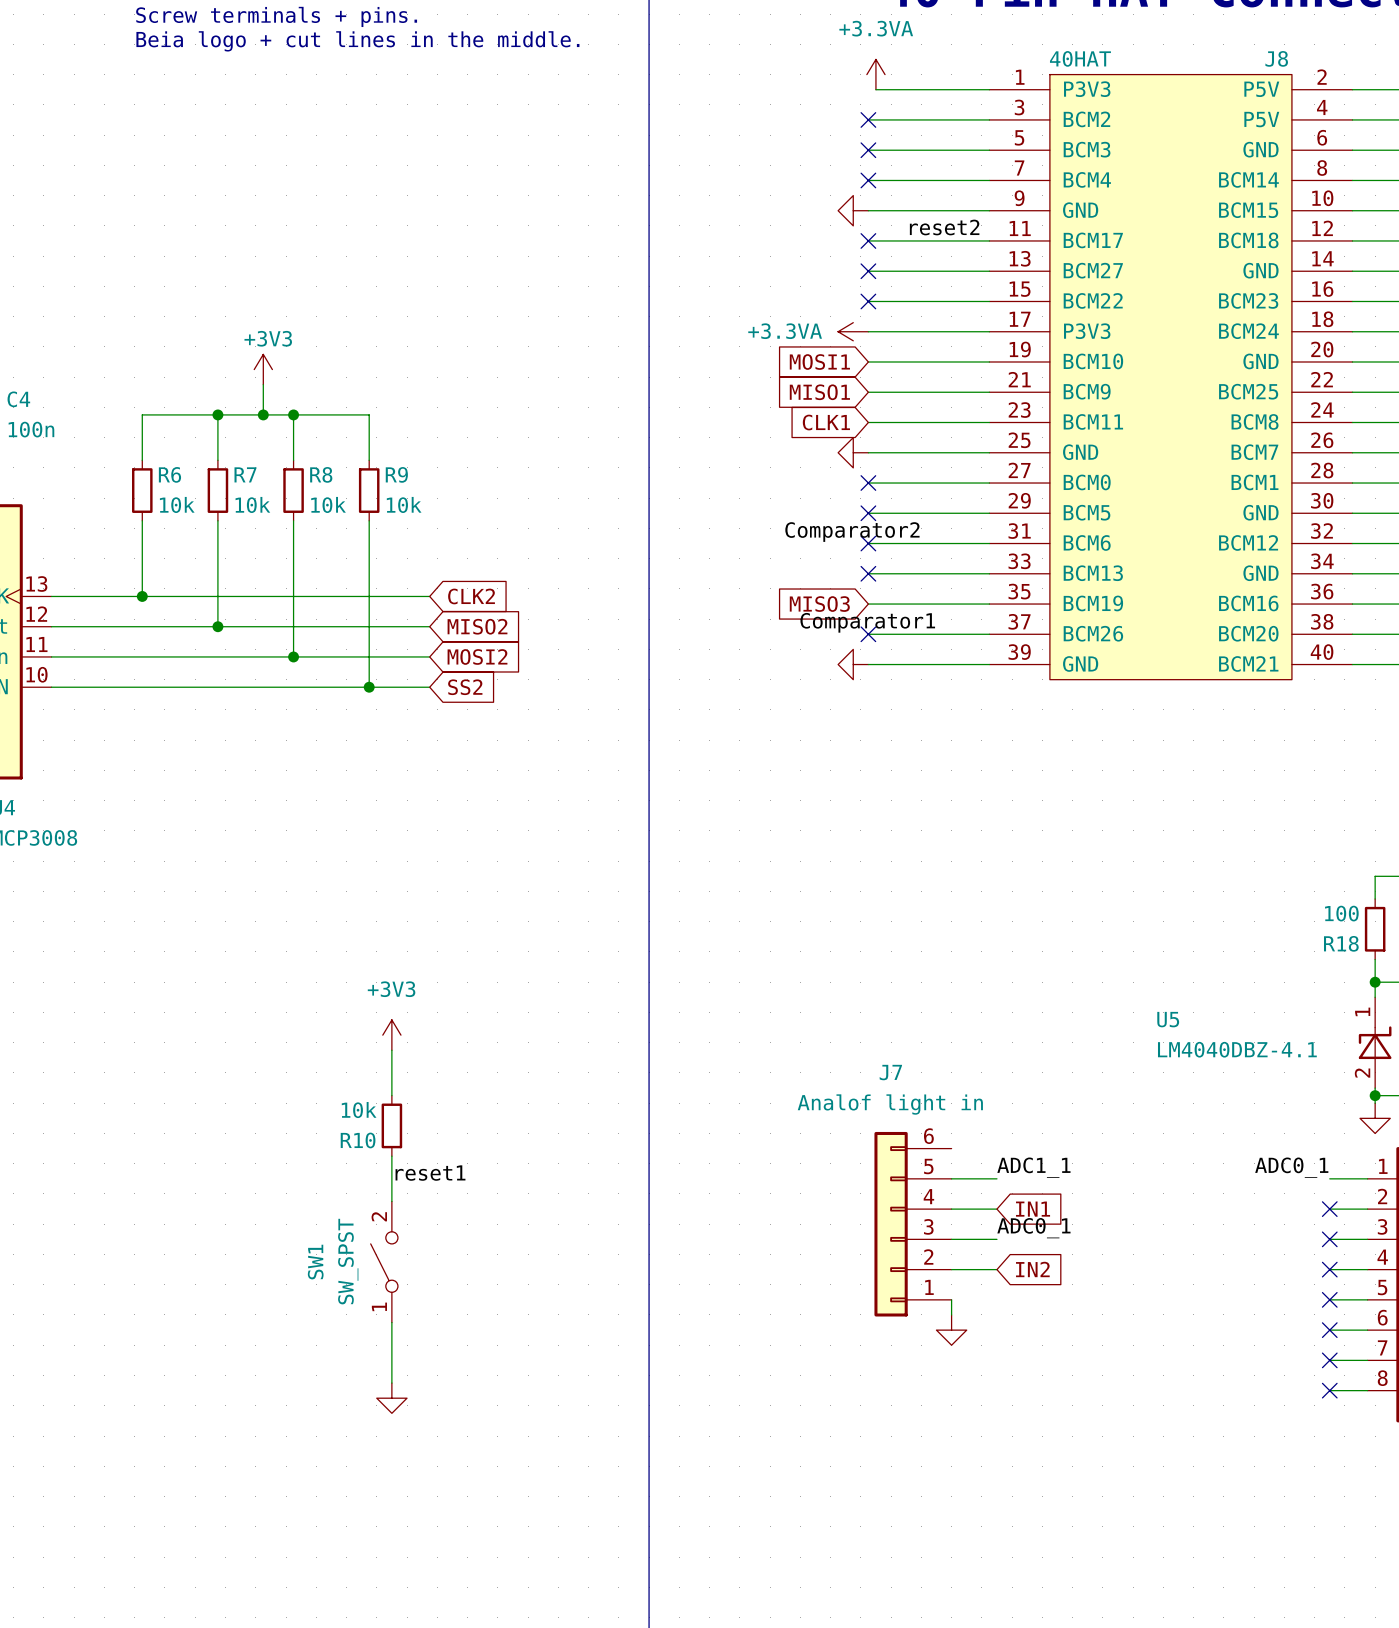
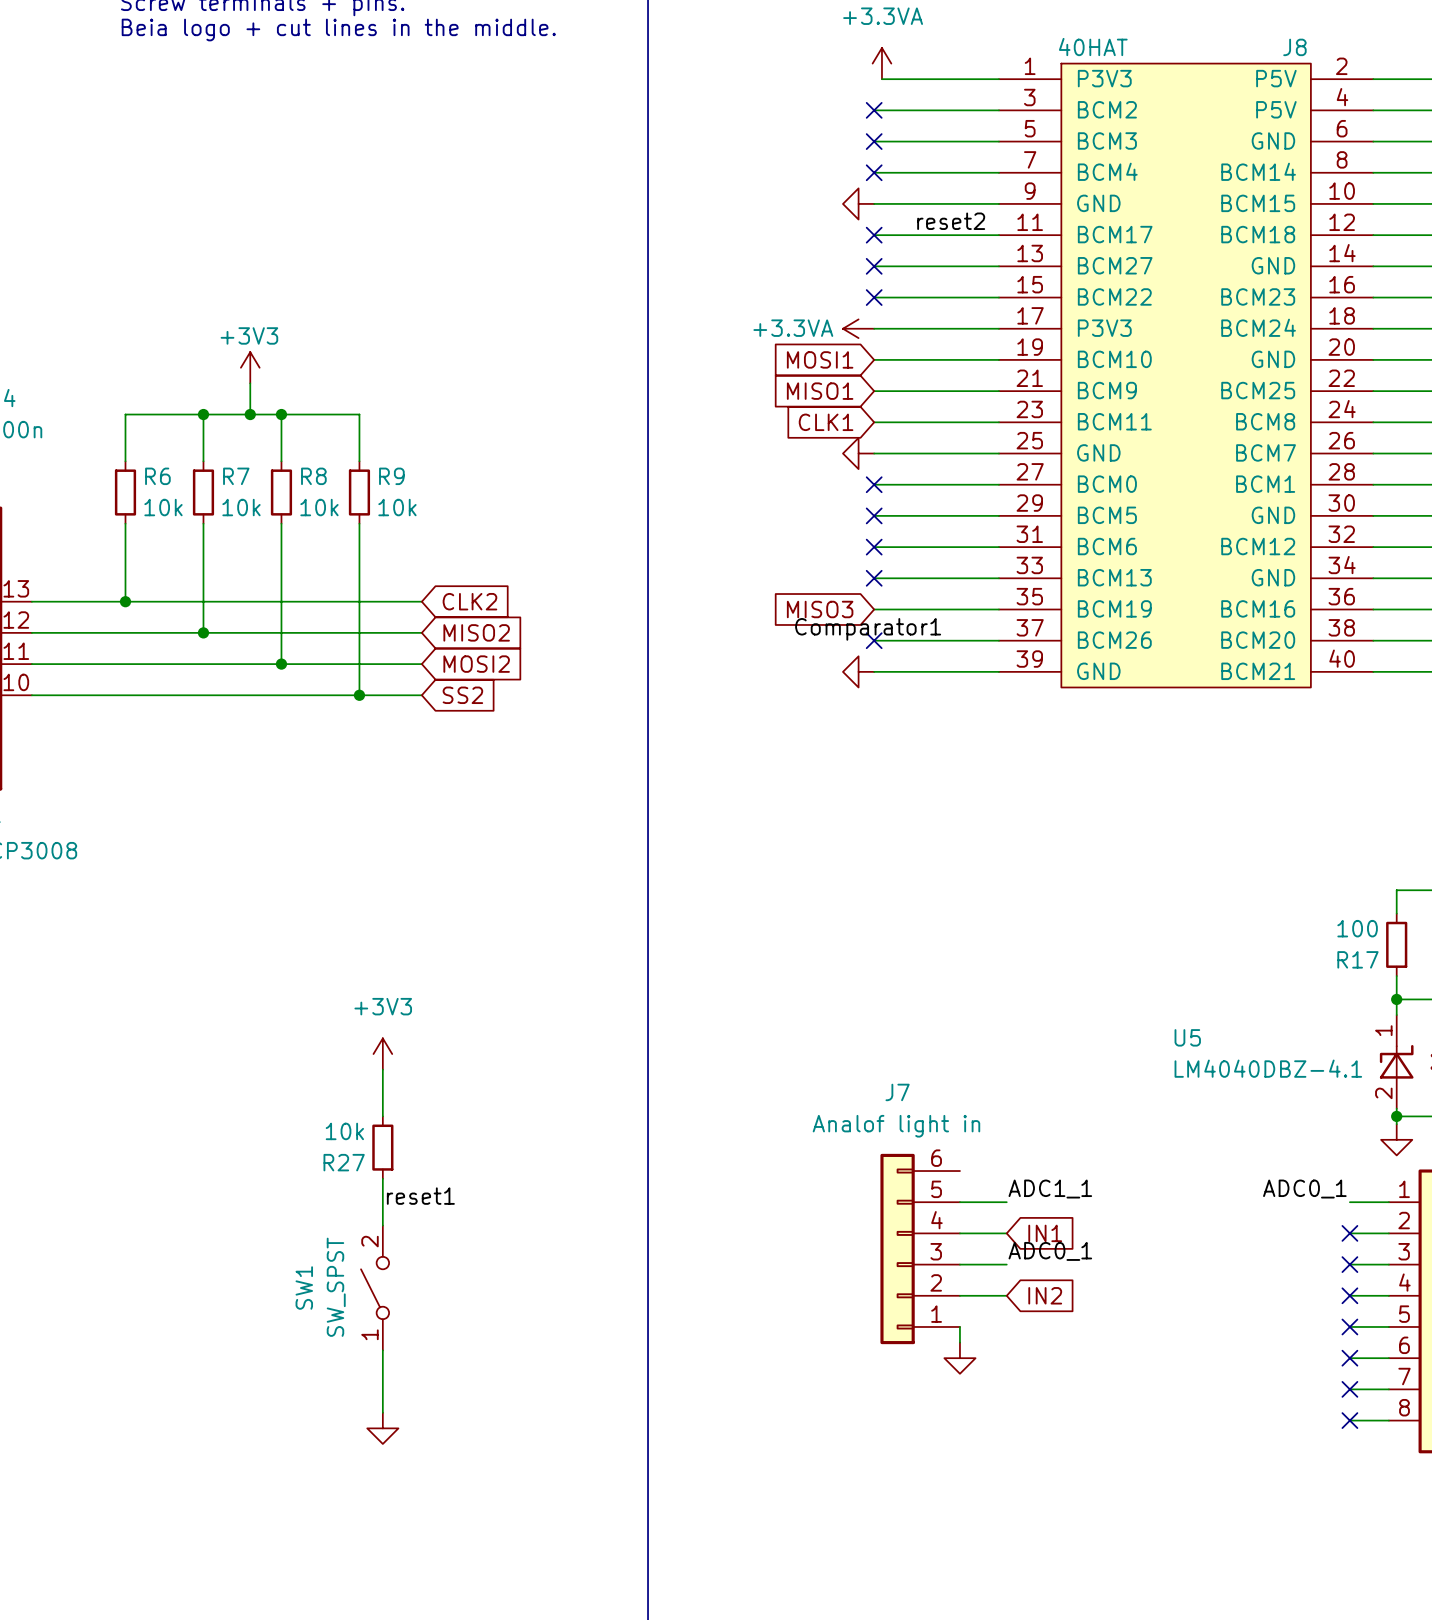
label: Comparator2 (852, 532) -> none
R18 name: R18 (1341, 943) -> R17 (1357, 959)
R10 name: R10 (358, 1140) -> R27 (344, 1162)

